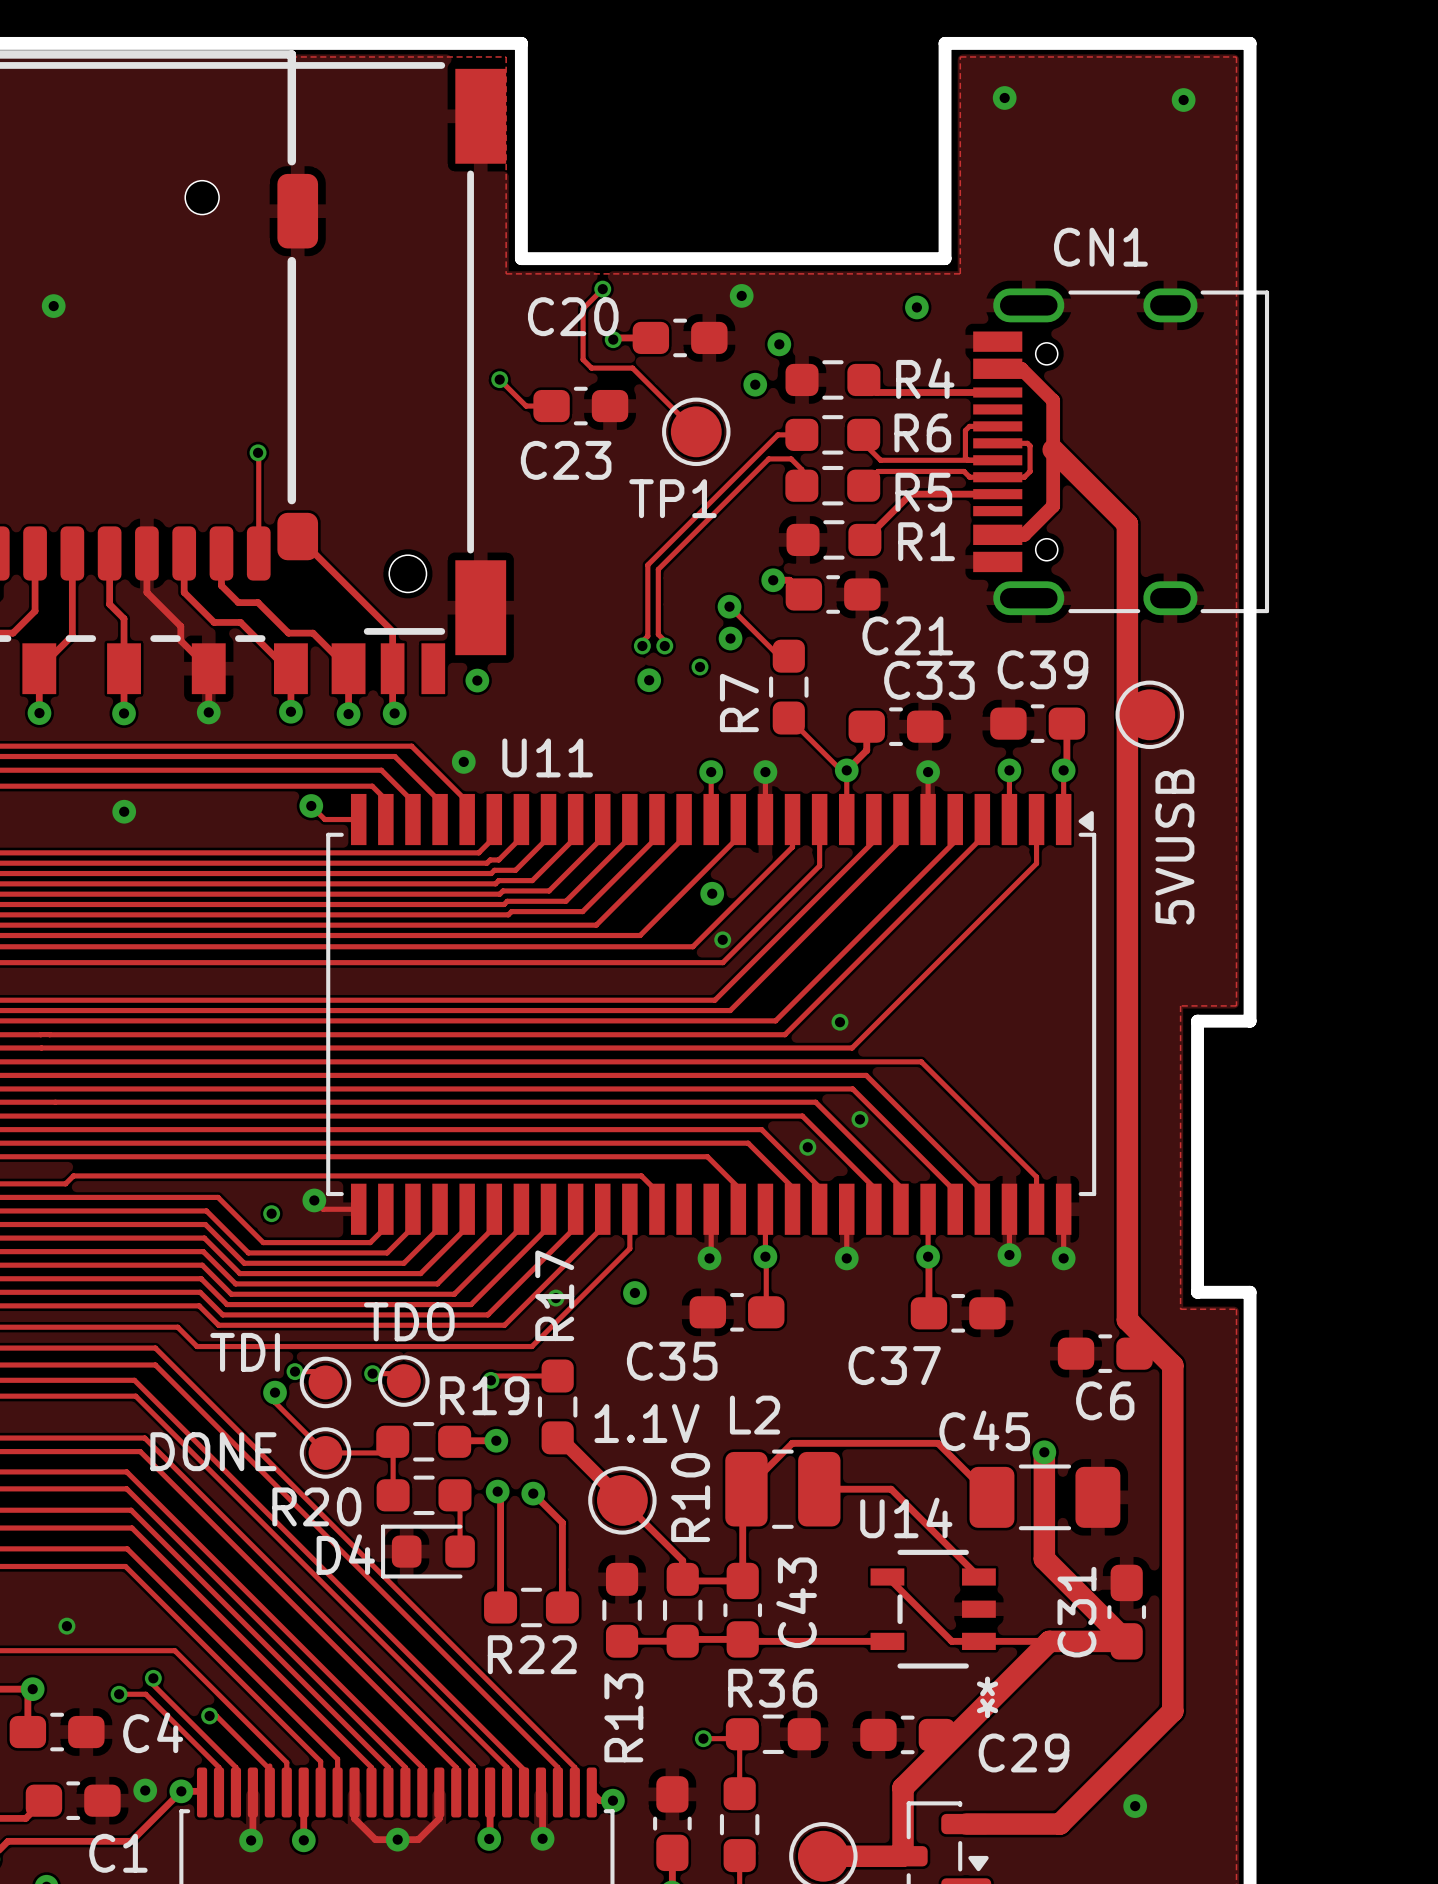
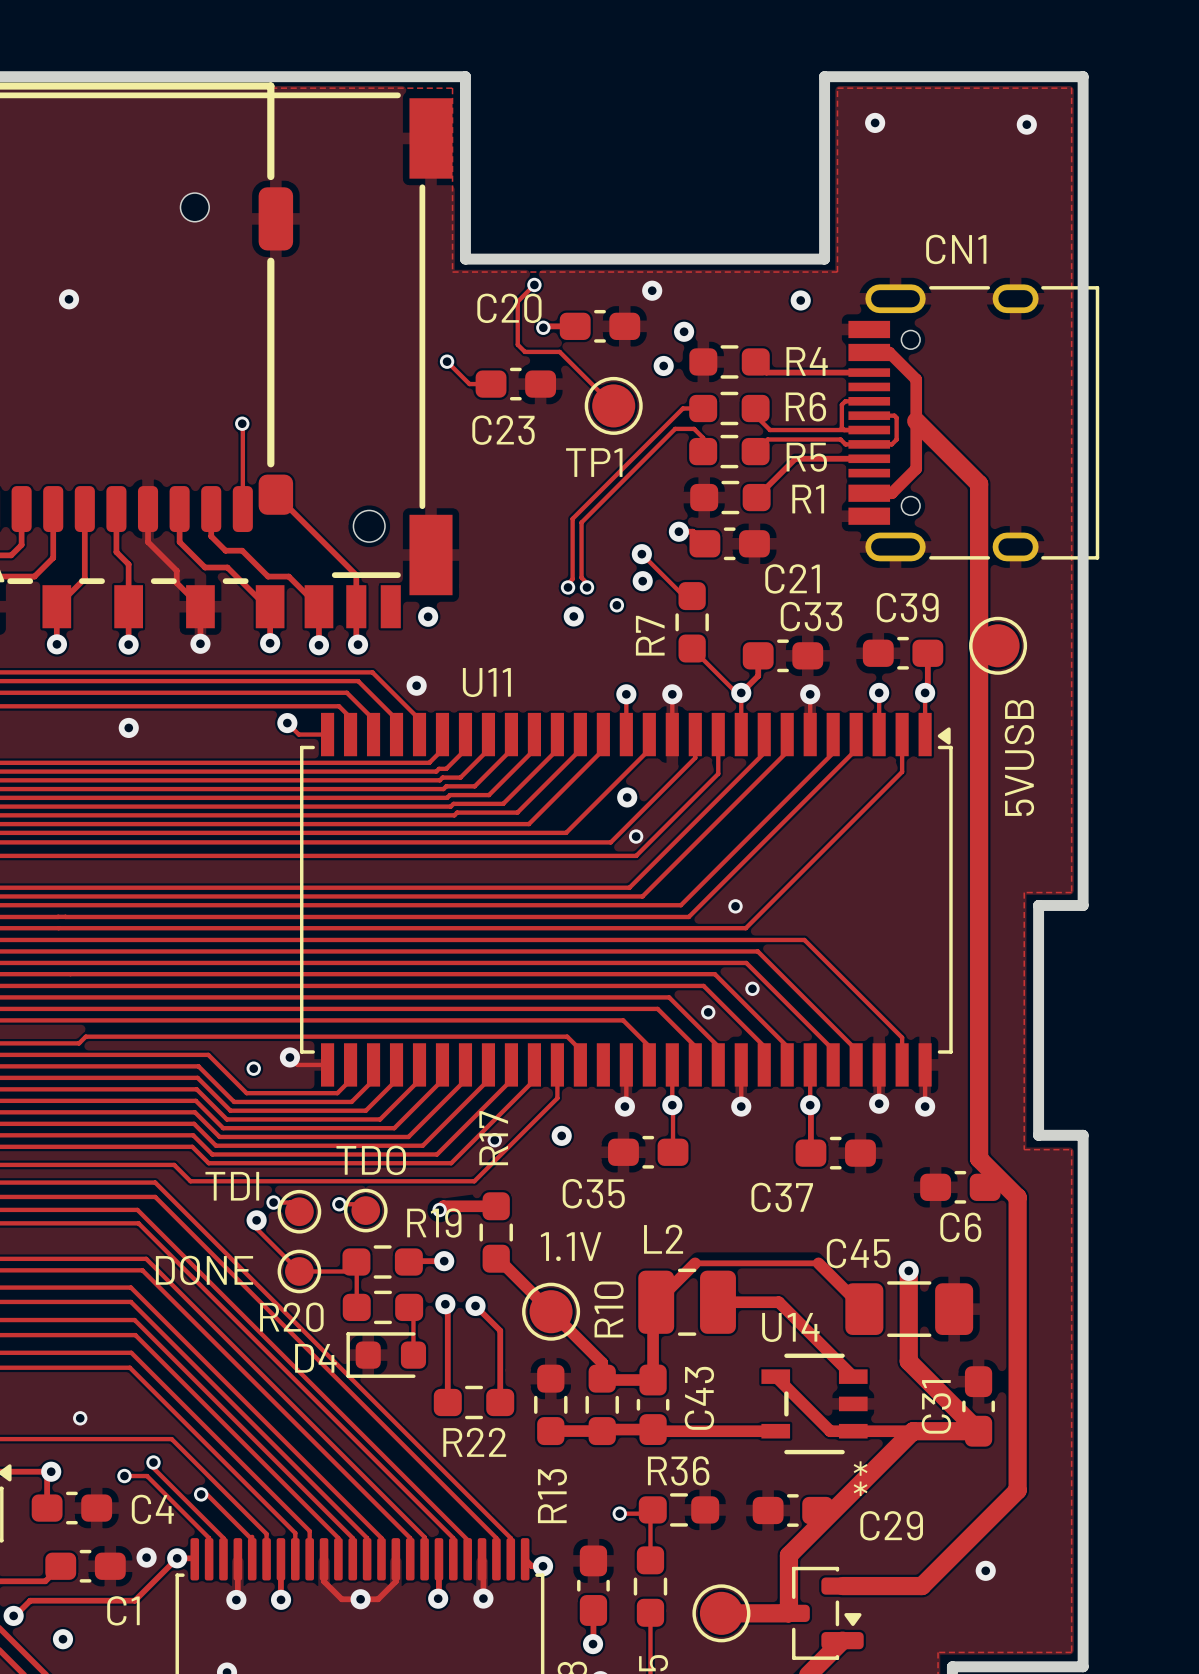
track width: thin (557, 1376) (495, 1376) (490, 1380) -> thick (496, 1206) (443, 1206) (439, 1210)
track width: thin (792, 1443) (742, 1492) (742, 1580) (684, 1580) (682, 1560) (622, 1500) -> thick (695, 1263) (653, 1305) (653, 1380) (603, 1380) (602, 1362) (551, 1311)
track width: thin (937, 1443) (991, 1497) -> thick (818, 1263) (864, 1309)
track width: thin (819, 1489) (891, 1489) (978, 1576) -> thick (717, 1302) (778, 1302) (853, 1376)
track width: thin (887, 1576) (951, 1641) (1126, 1641) -> thick (775, 1376) (830, 1431) (978, 1431)
track width: thin (622, 1641) (742, 1639) (744, 1641) (887, 1641) -> thick (550, 1431) (653, 1429) (654, 1431) (775, 1431)

